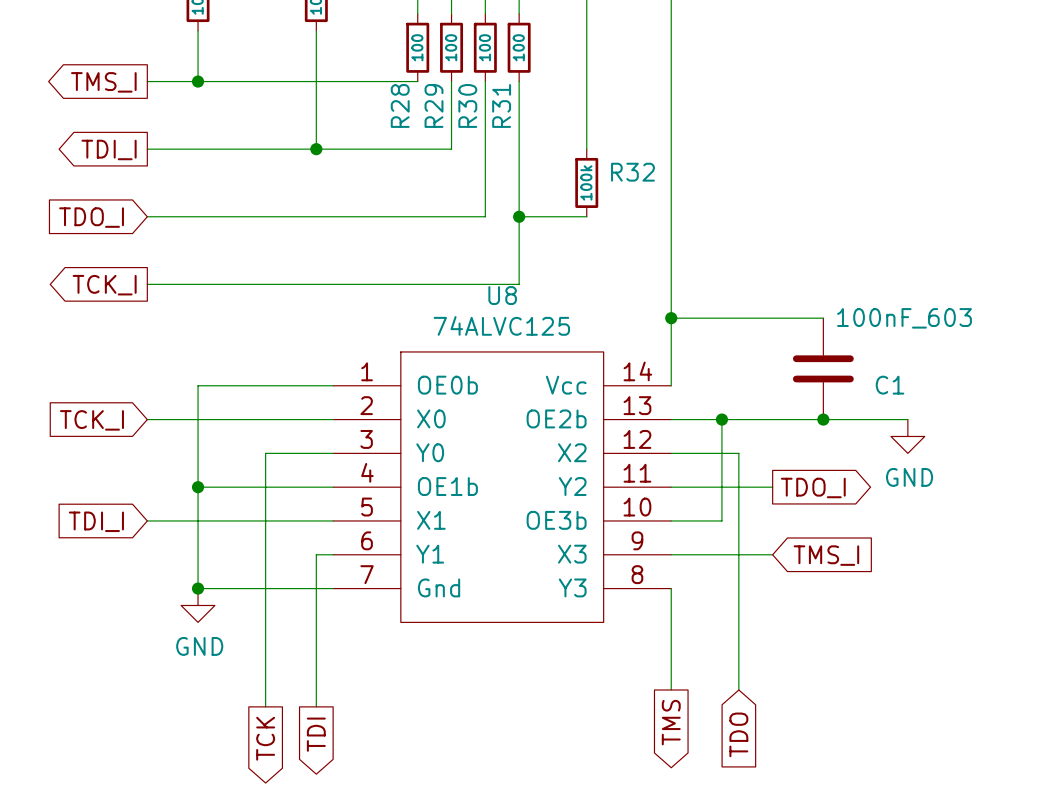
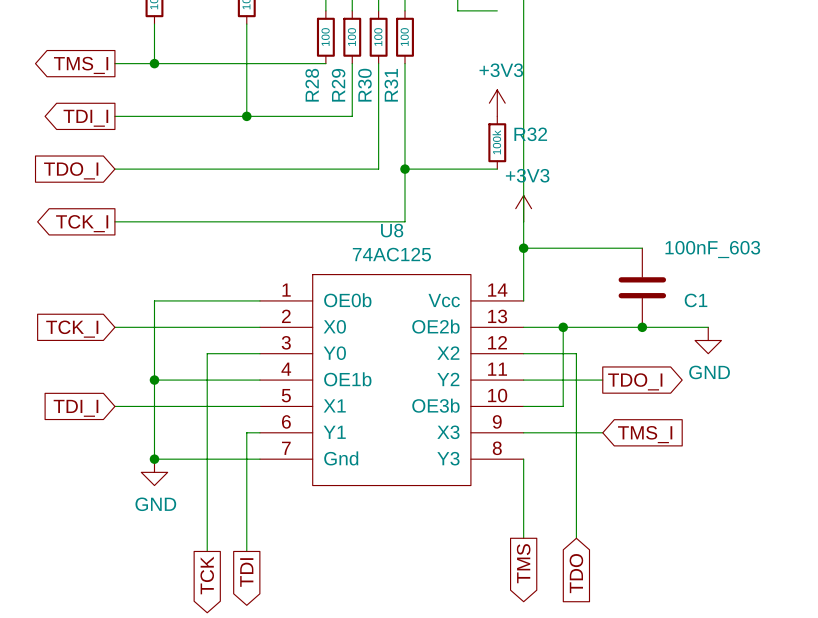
wire: (586, 13) (586, 149) -> (457, 10) (497, 10)
power symbol: none -> +3V3 (497, 103)
R32 position: (586, 182) -> (497, 142)
wire: none -> (457, 169) (497, 169)
power symbol: none -> +3V3 (523, 208)
U8 value: 74ALVC125 (501, 325) -> 74AC125 (391, 254)

